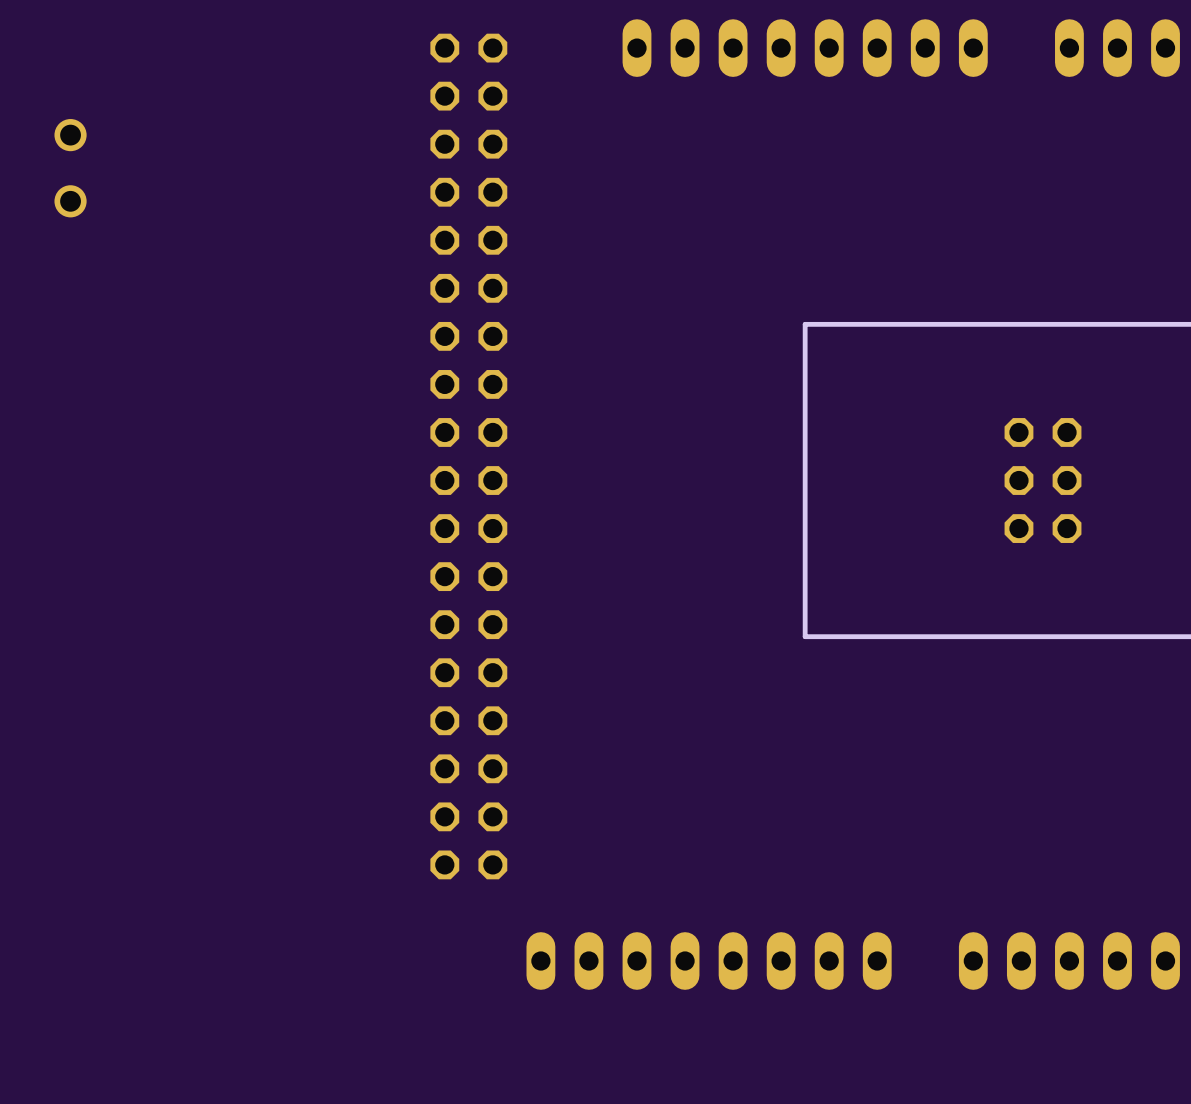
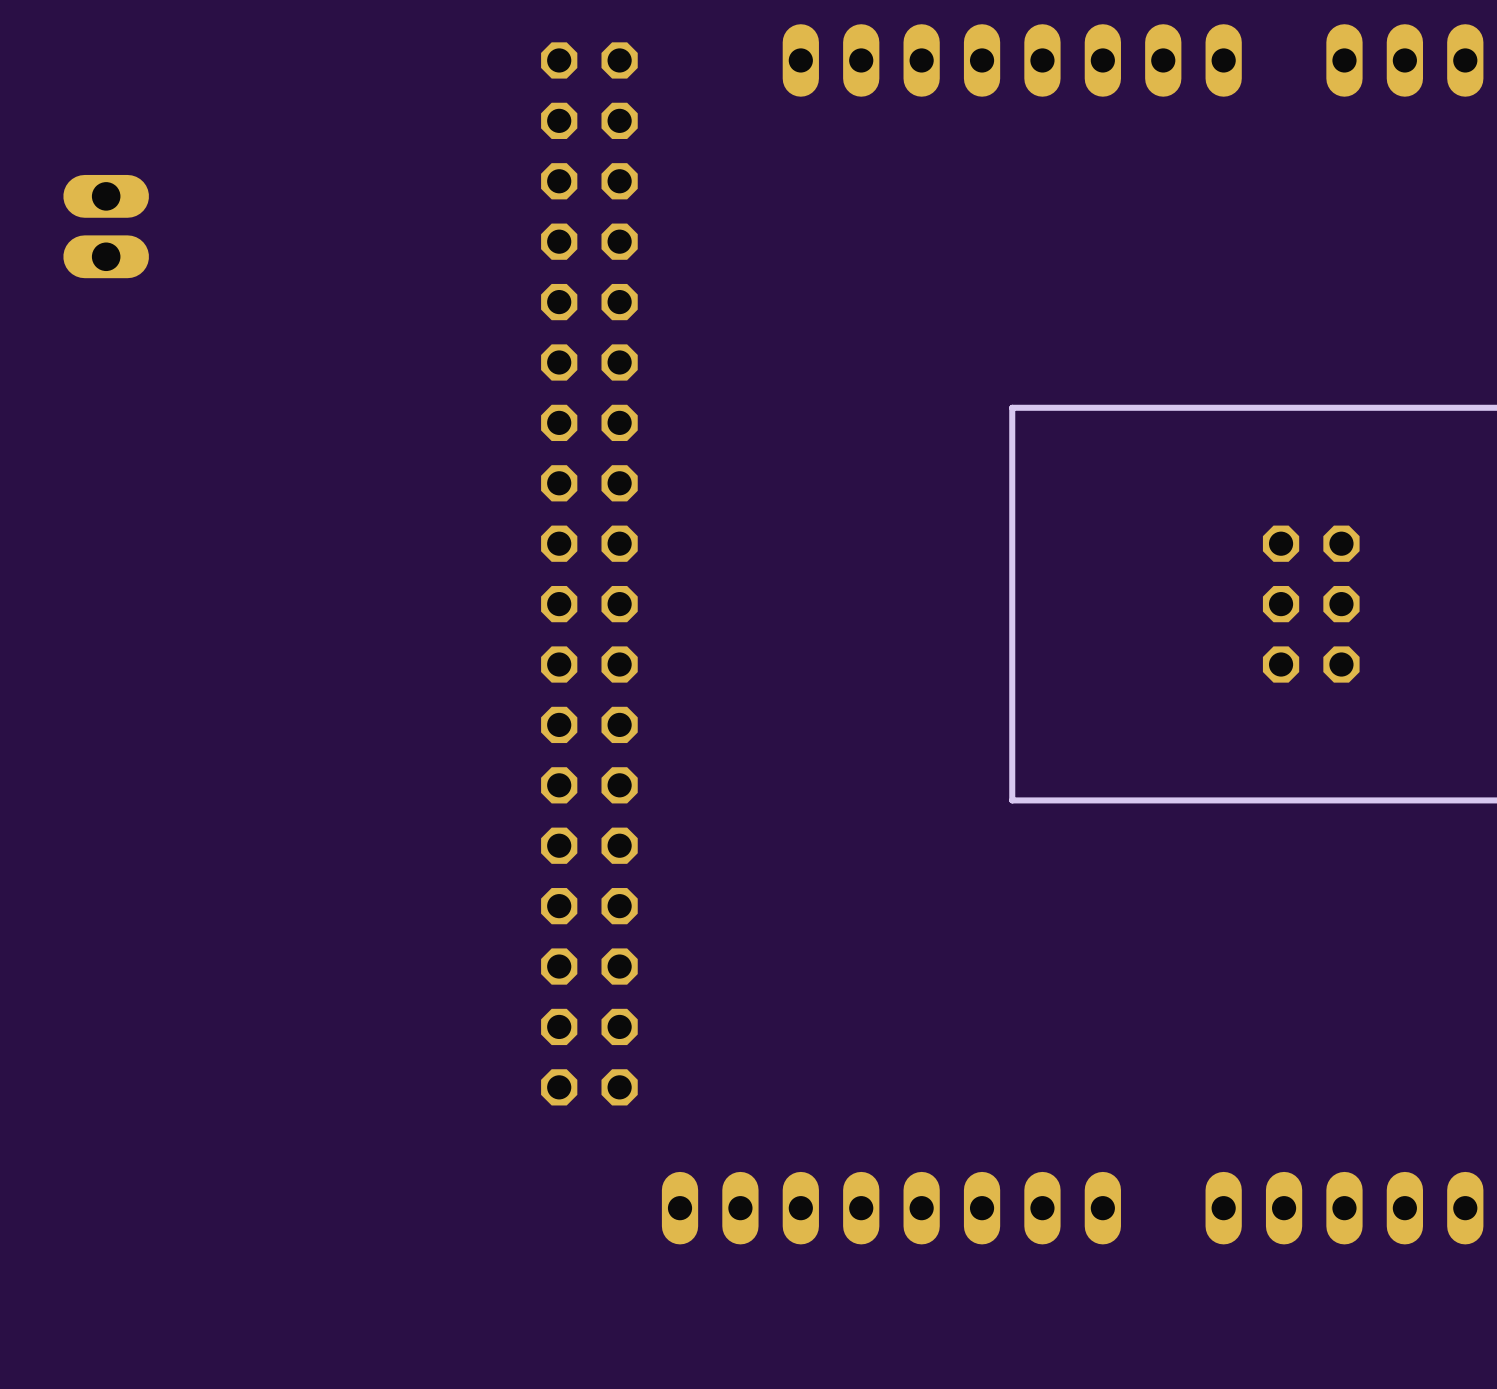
part footprint: [54, 119, 87, 218] -> [63, 174, 149, 279]

